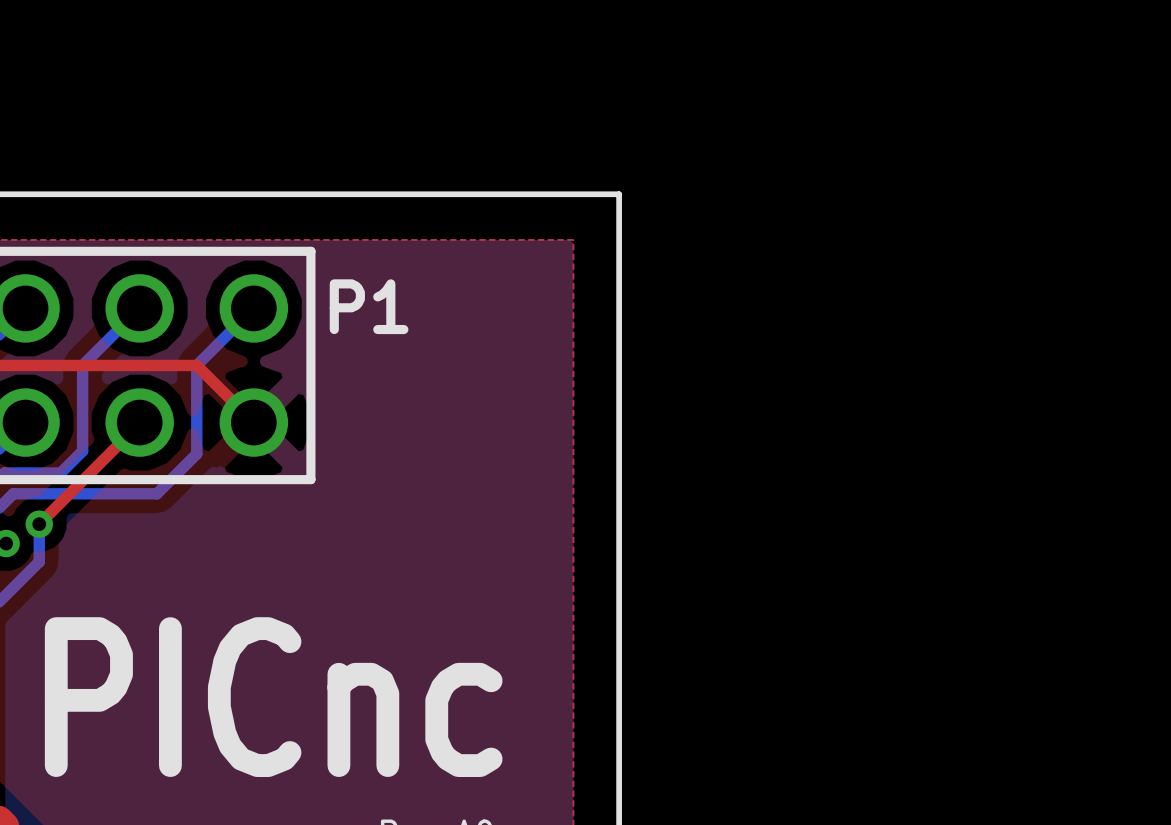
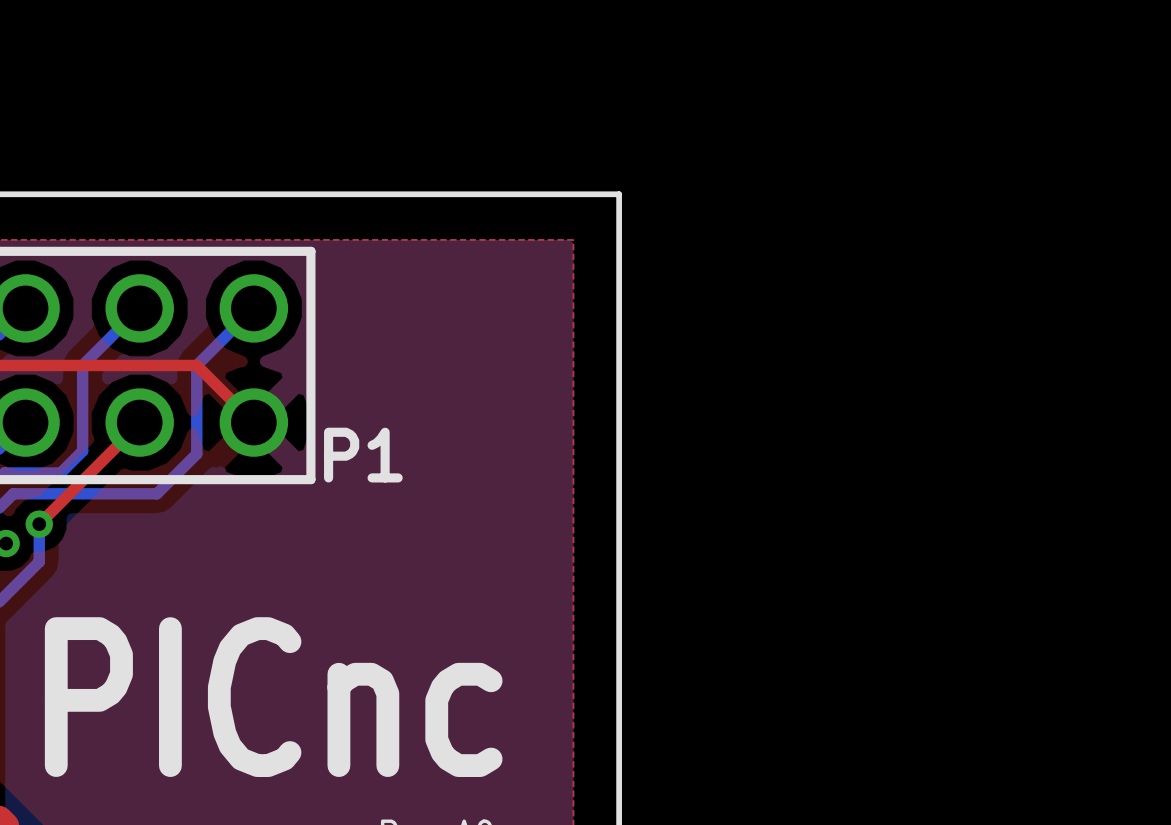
P1 name position: P1 (369, 306) -> P1 (363, 455)

